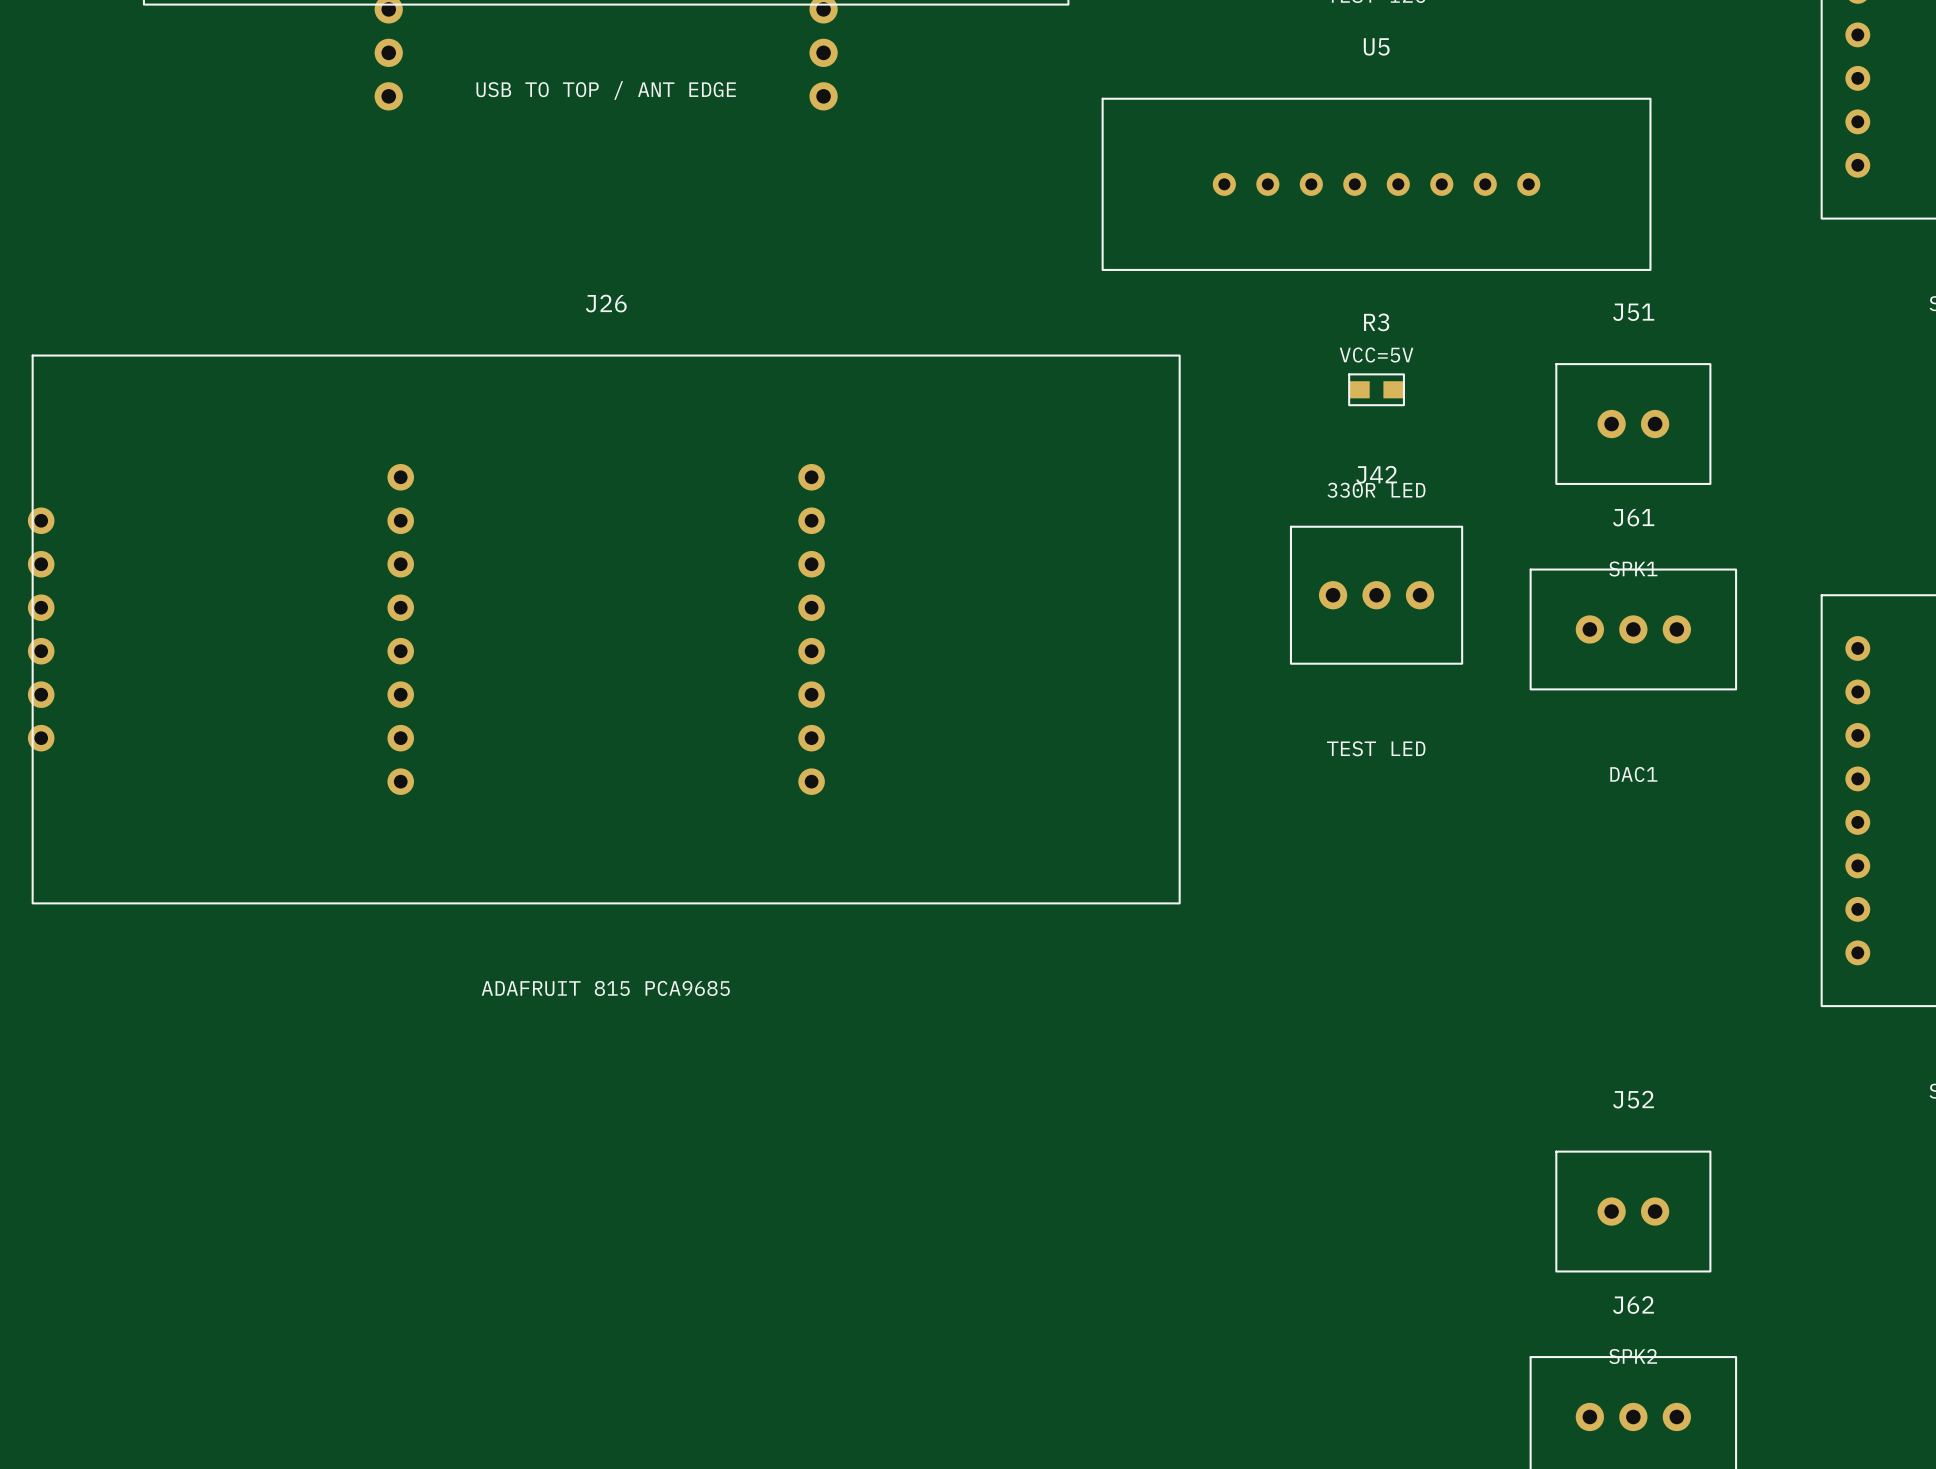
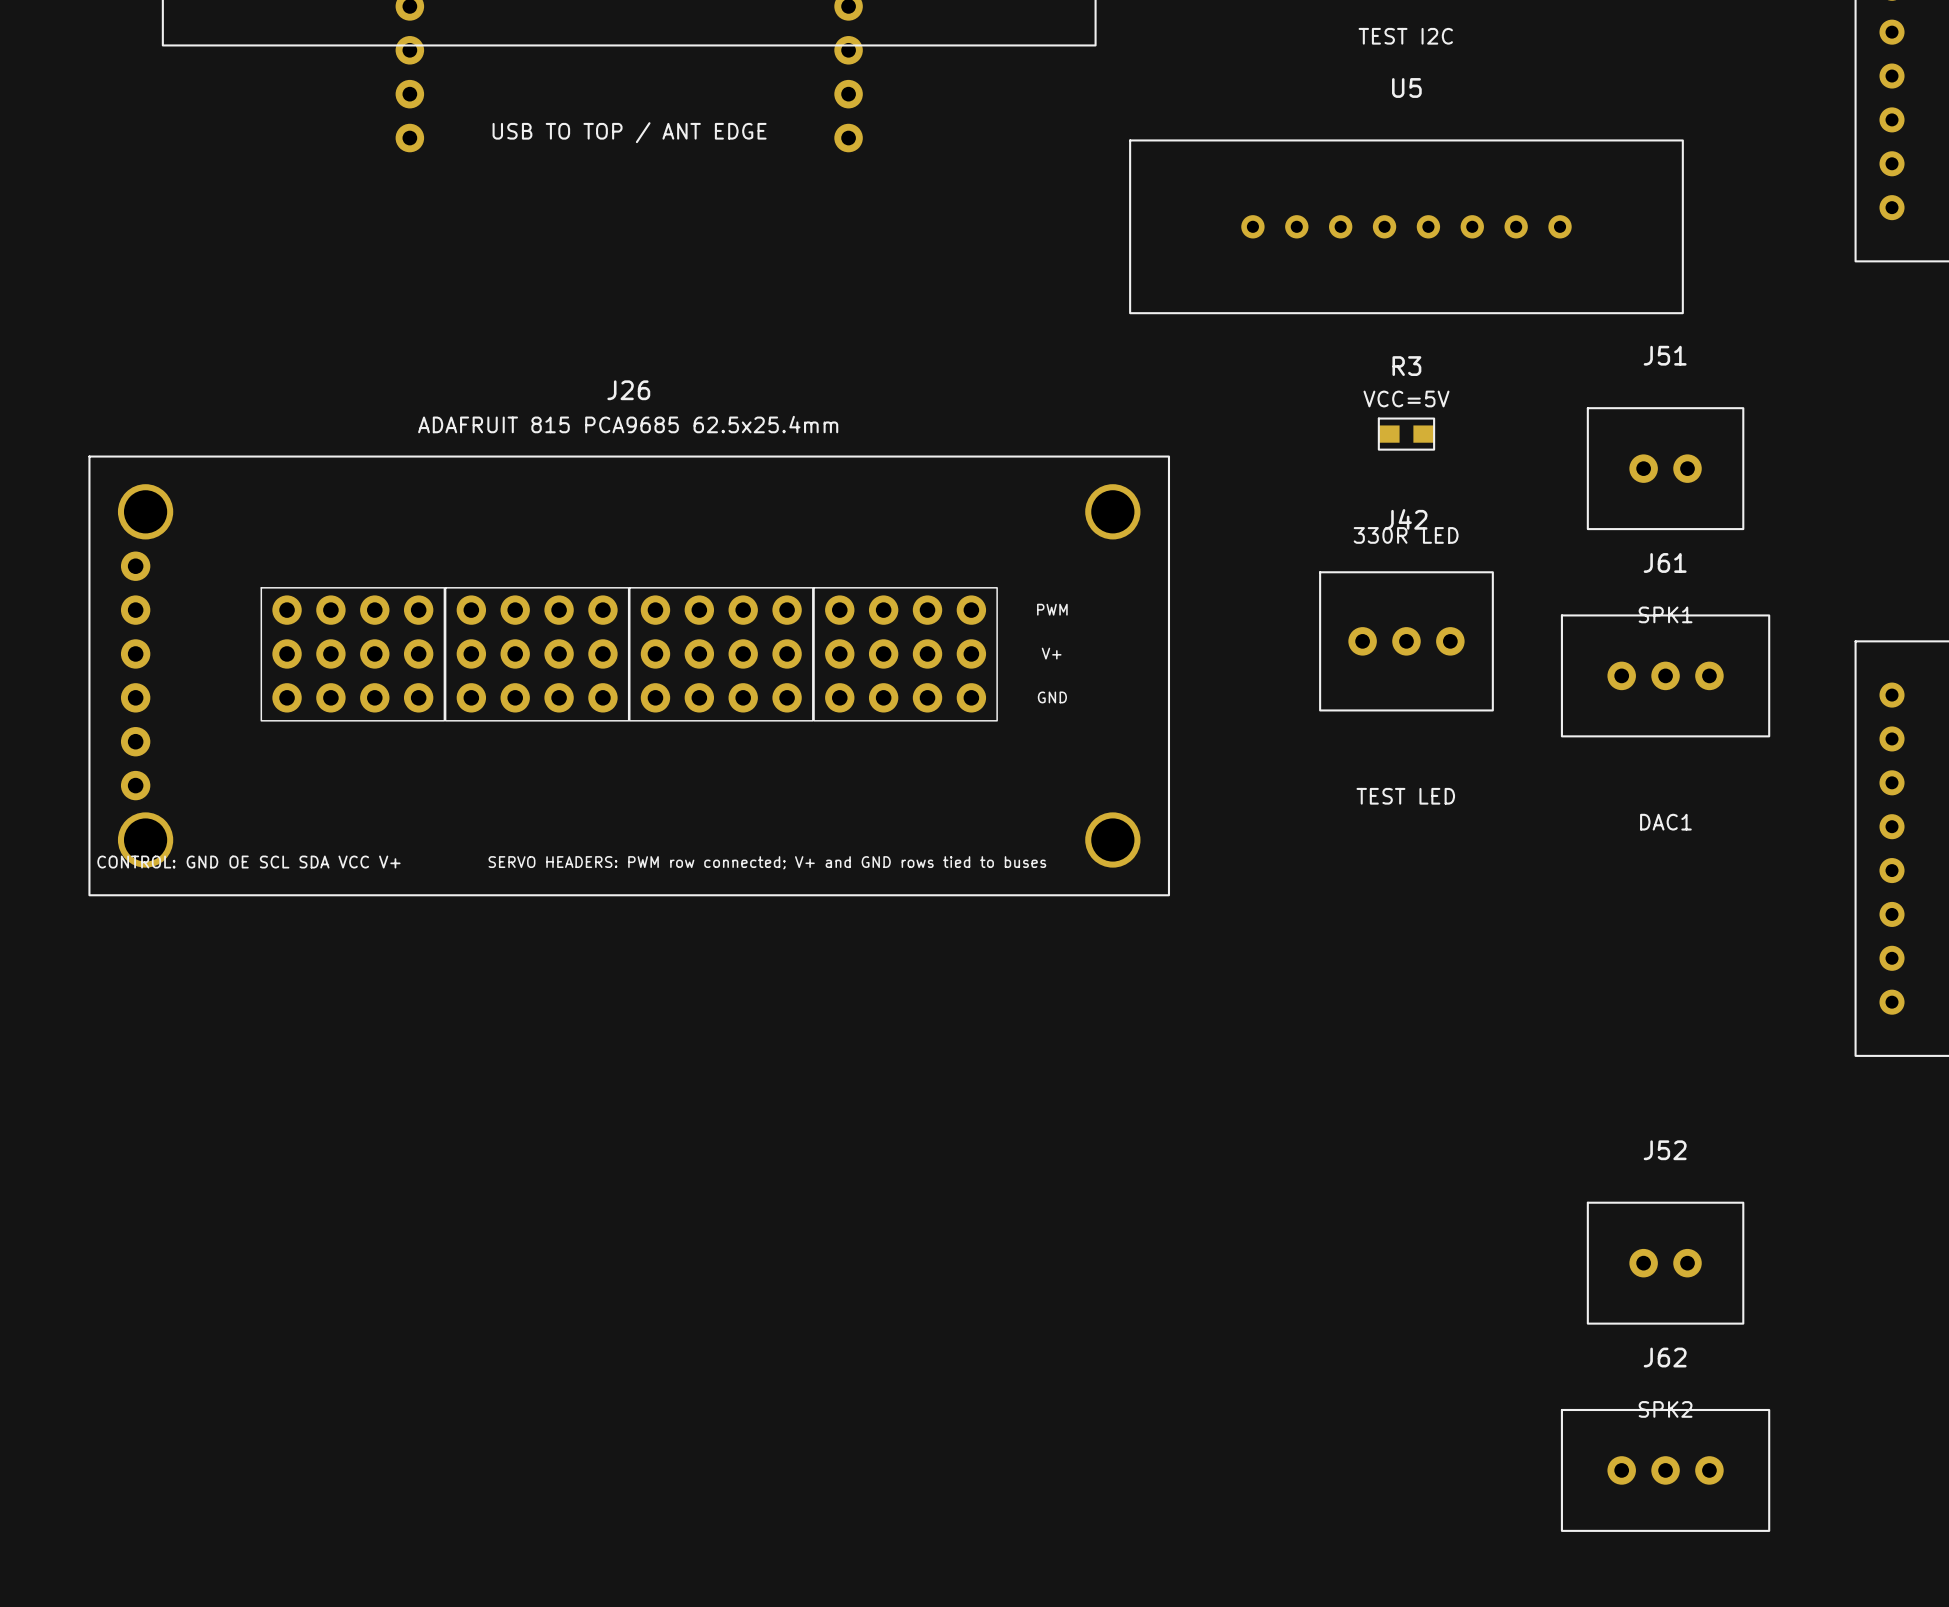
J26 name position: J26 (606, 303) -> J26 (628, 390)
J26 footprint: [27, 354, 1181, 905] -> [88, 455, 1171, 897]

